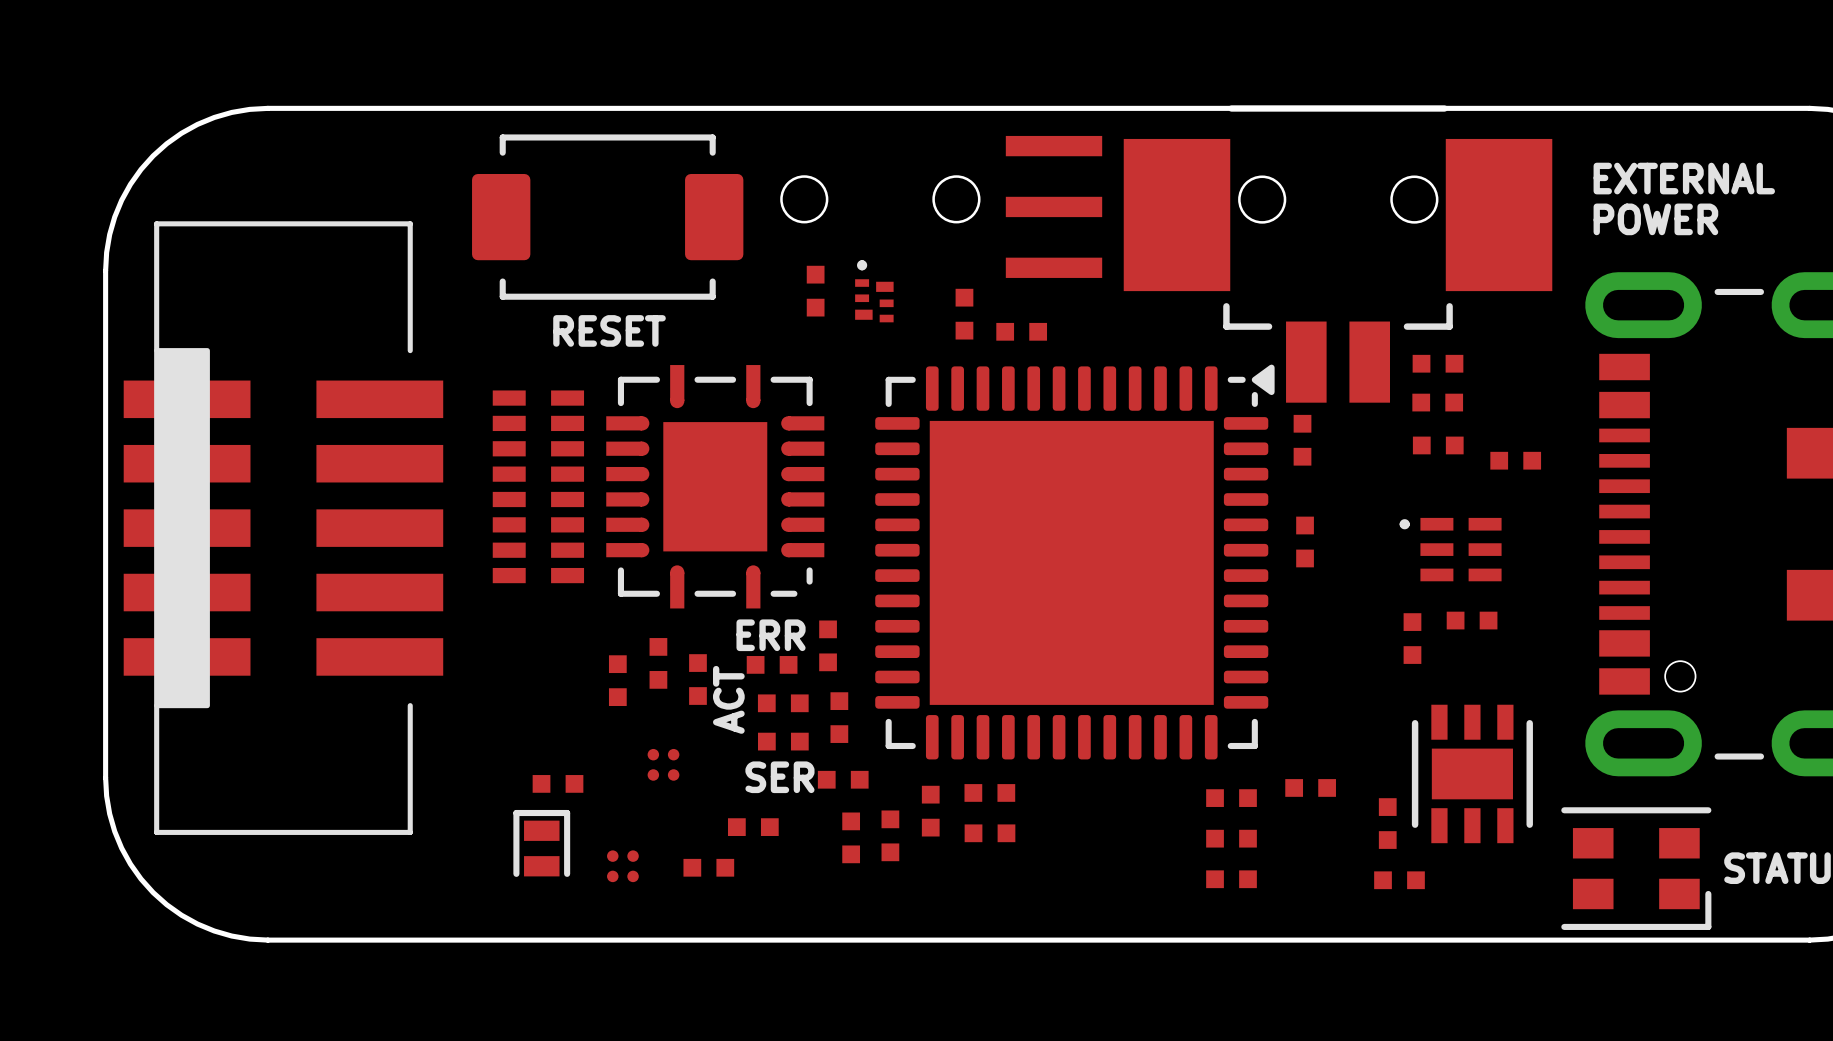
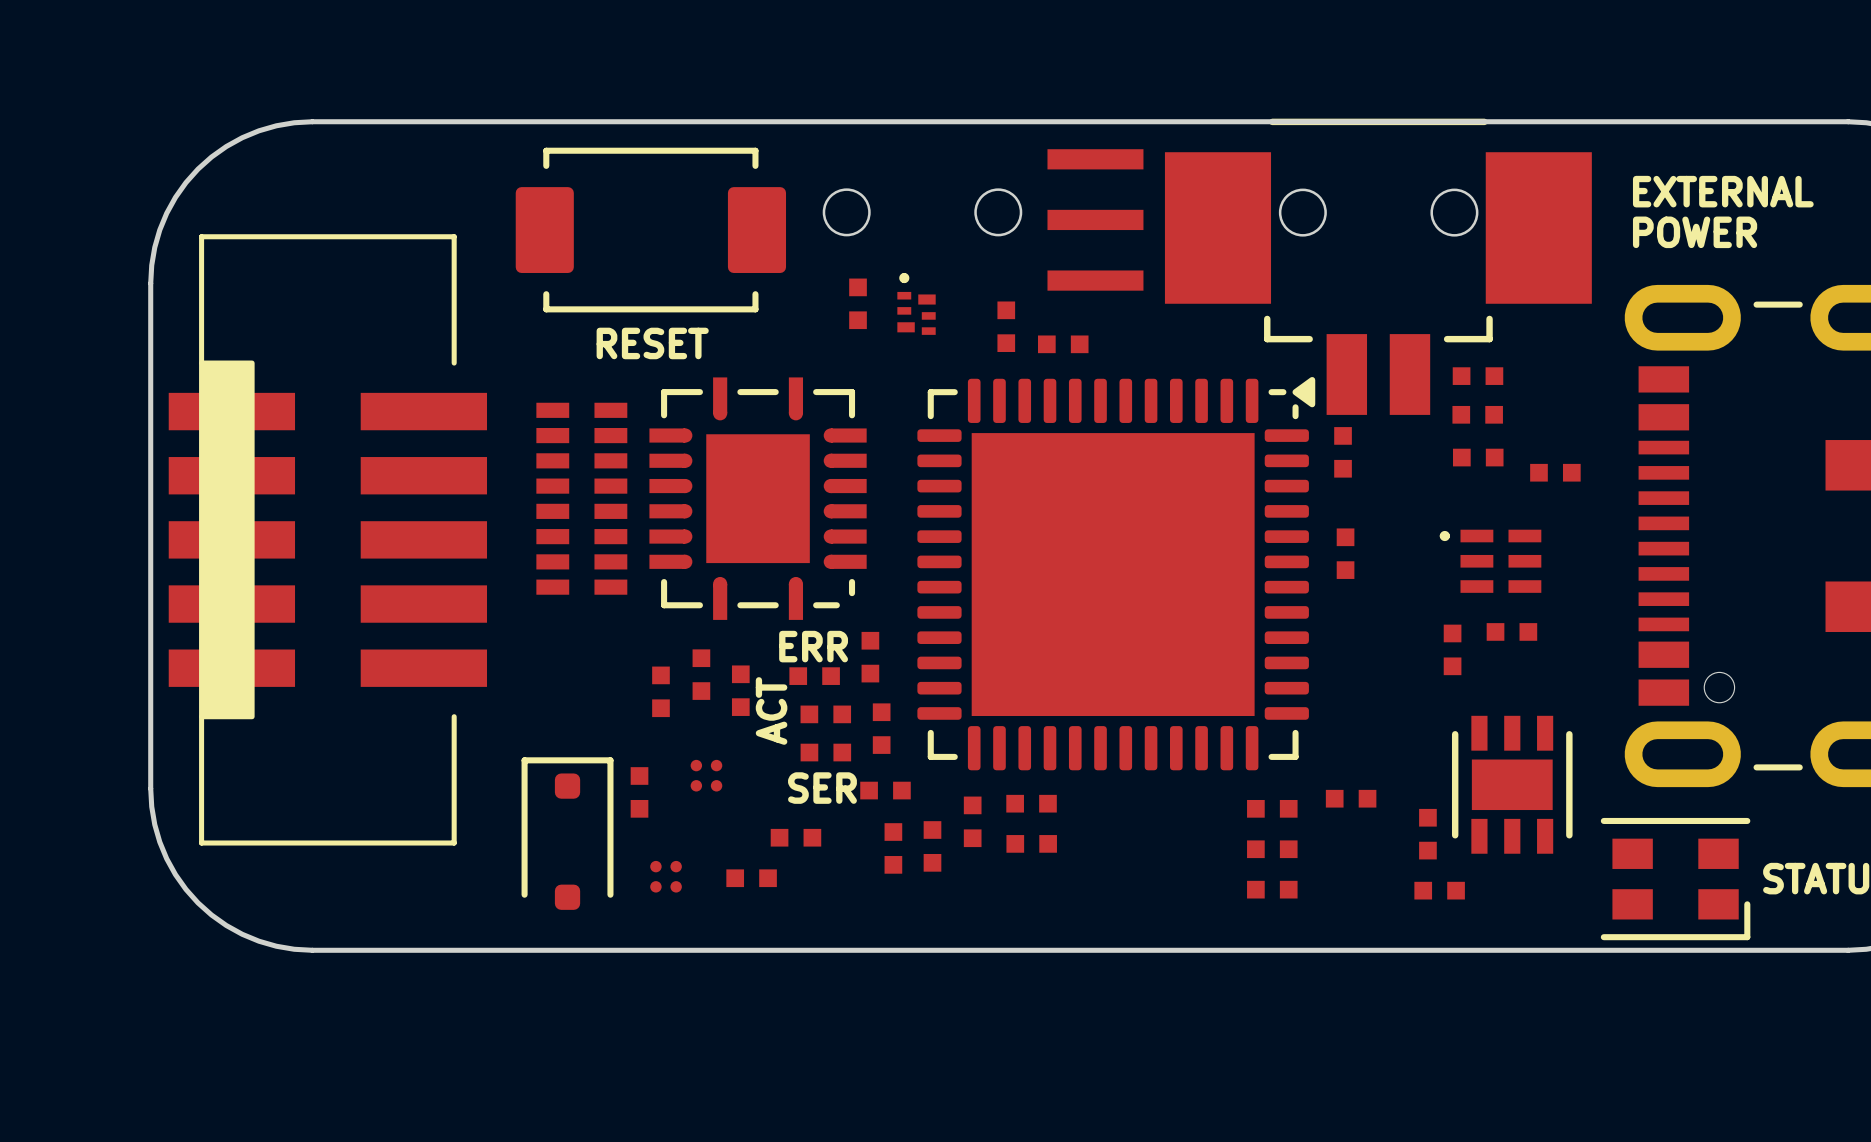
part rotation: 0° (558, 783) -> 90° clockwise (639, 792)
part position: (558, 783) -> (639, 792)
part: none -> (567, 833)
part: (541, 843) -> none

